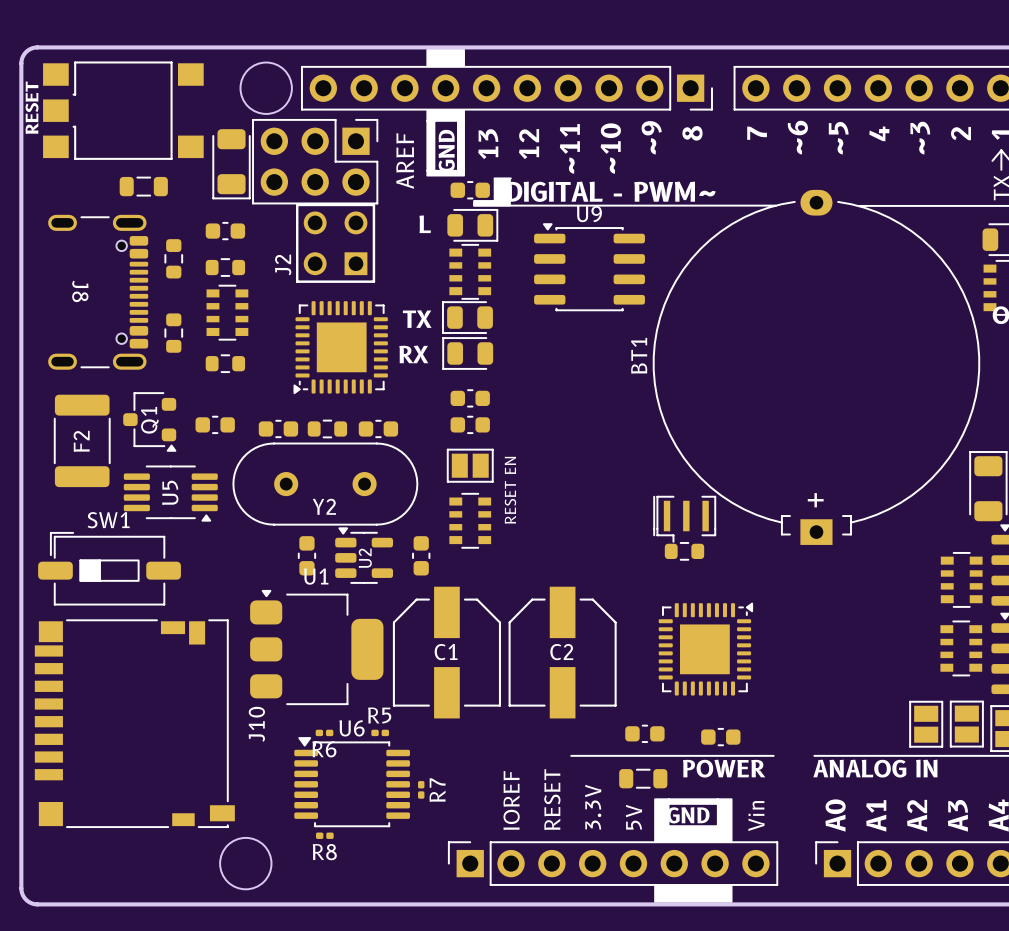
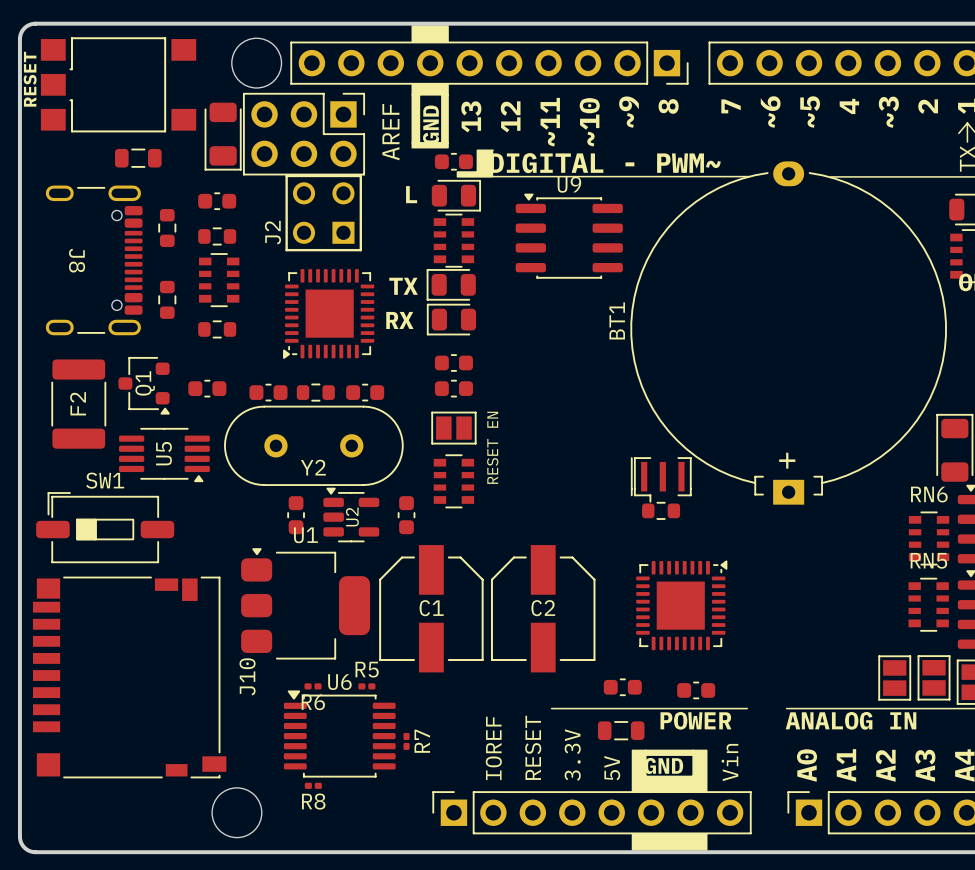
RN6 name: none -> RN6 (929, 494)
RN5 name: none -> RN5 (928, 560)

